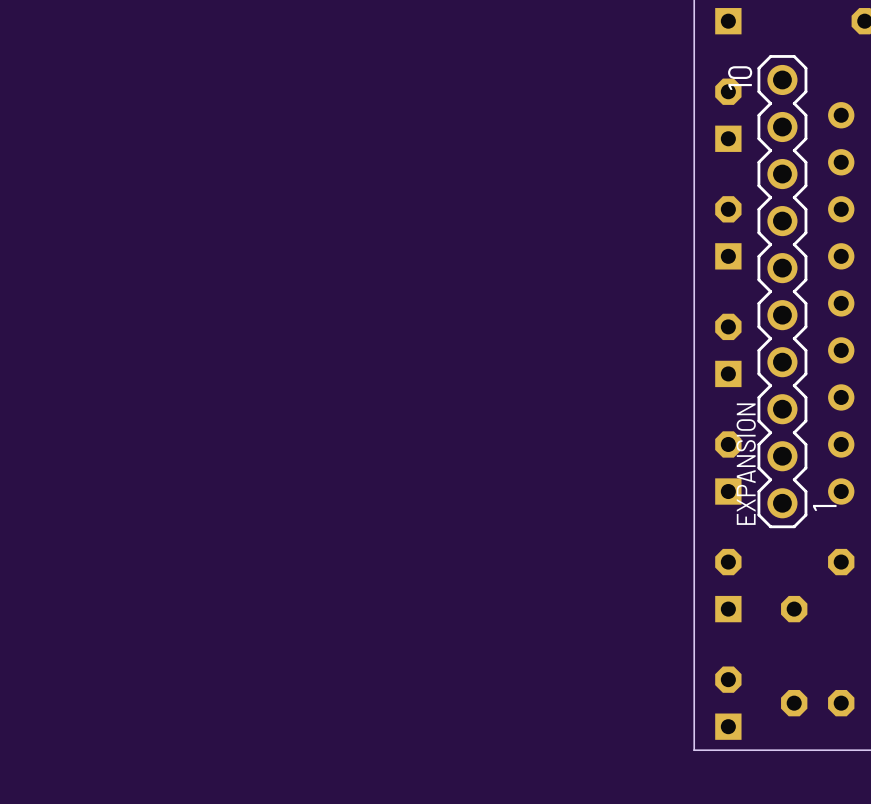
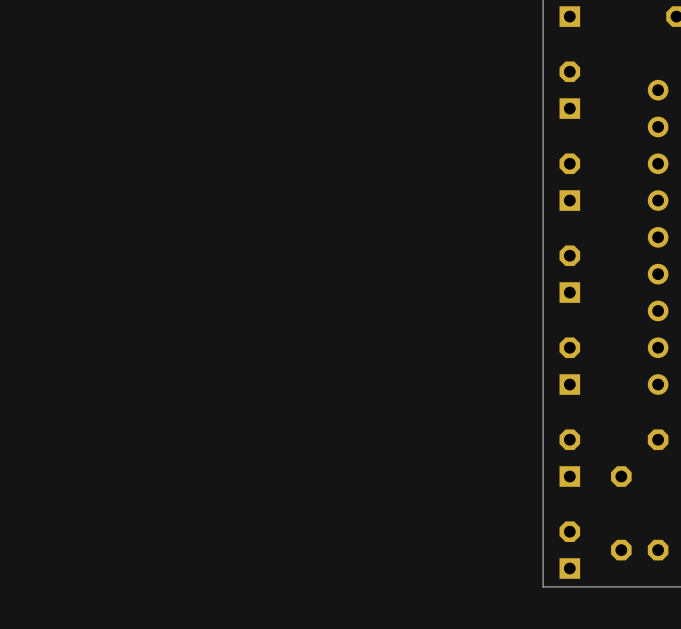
EXPANSION: (782, 291) -> none

